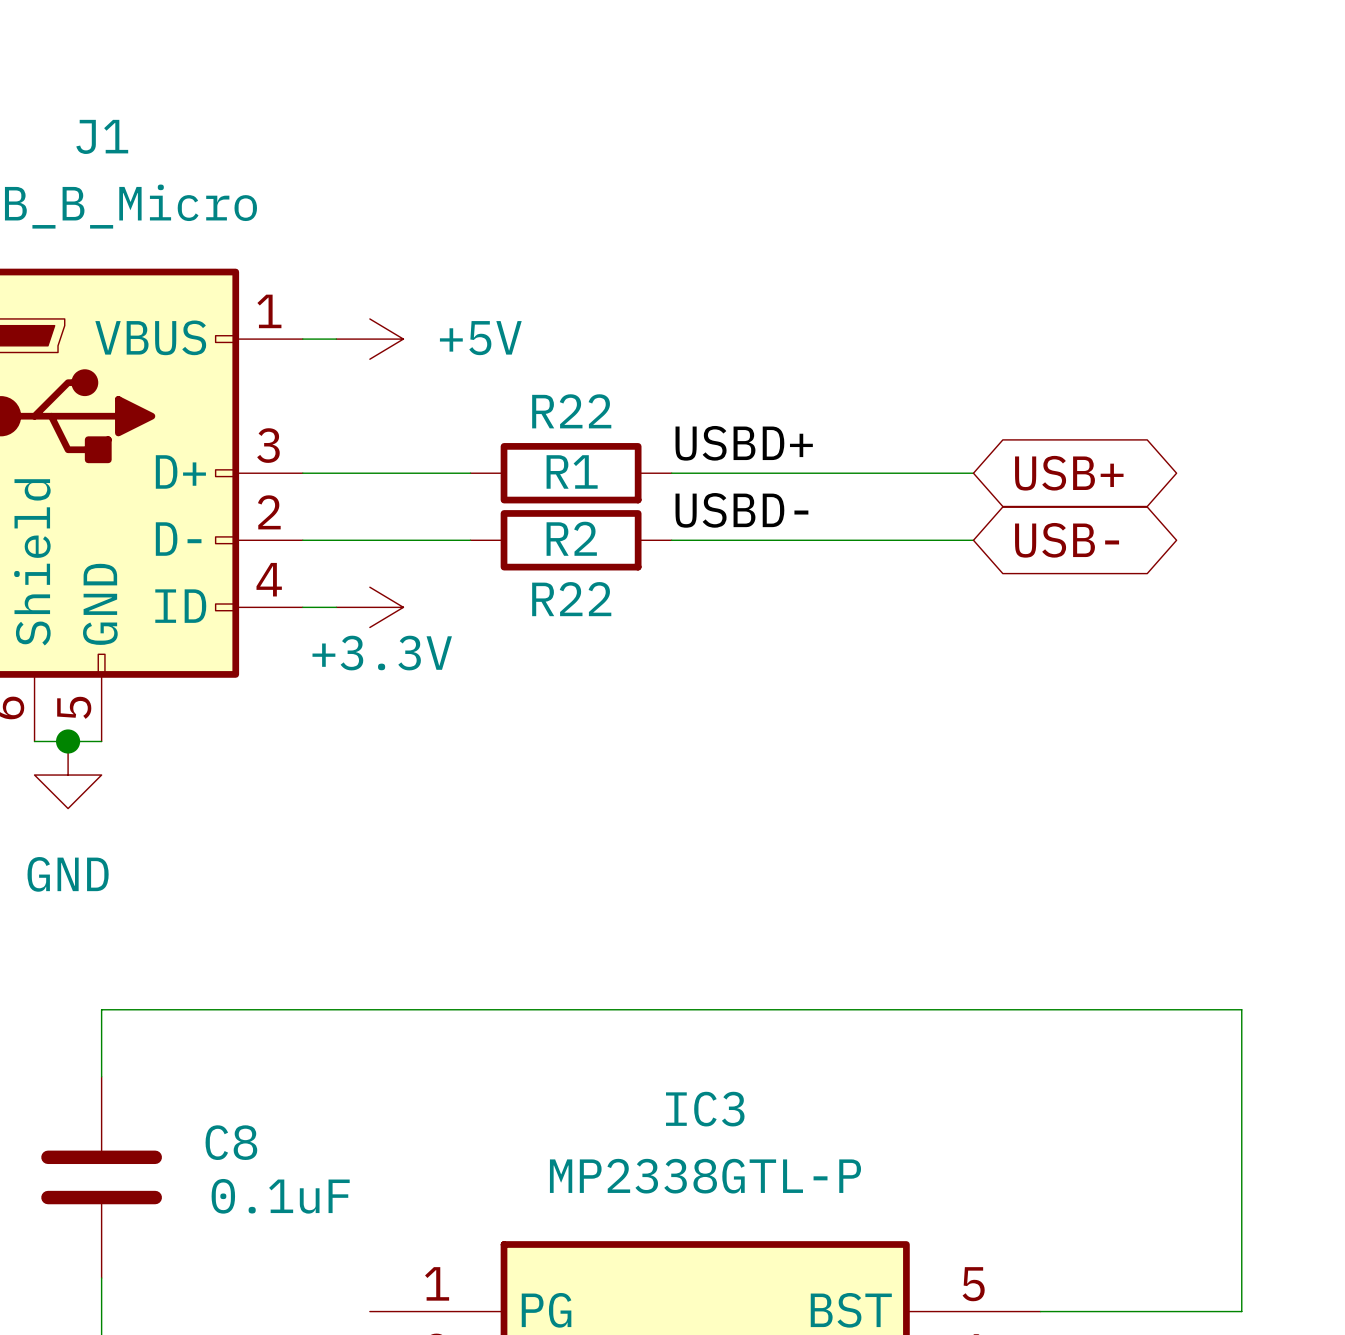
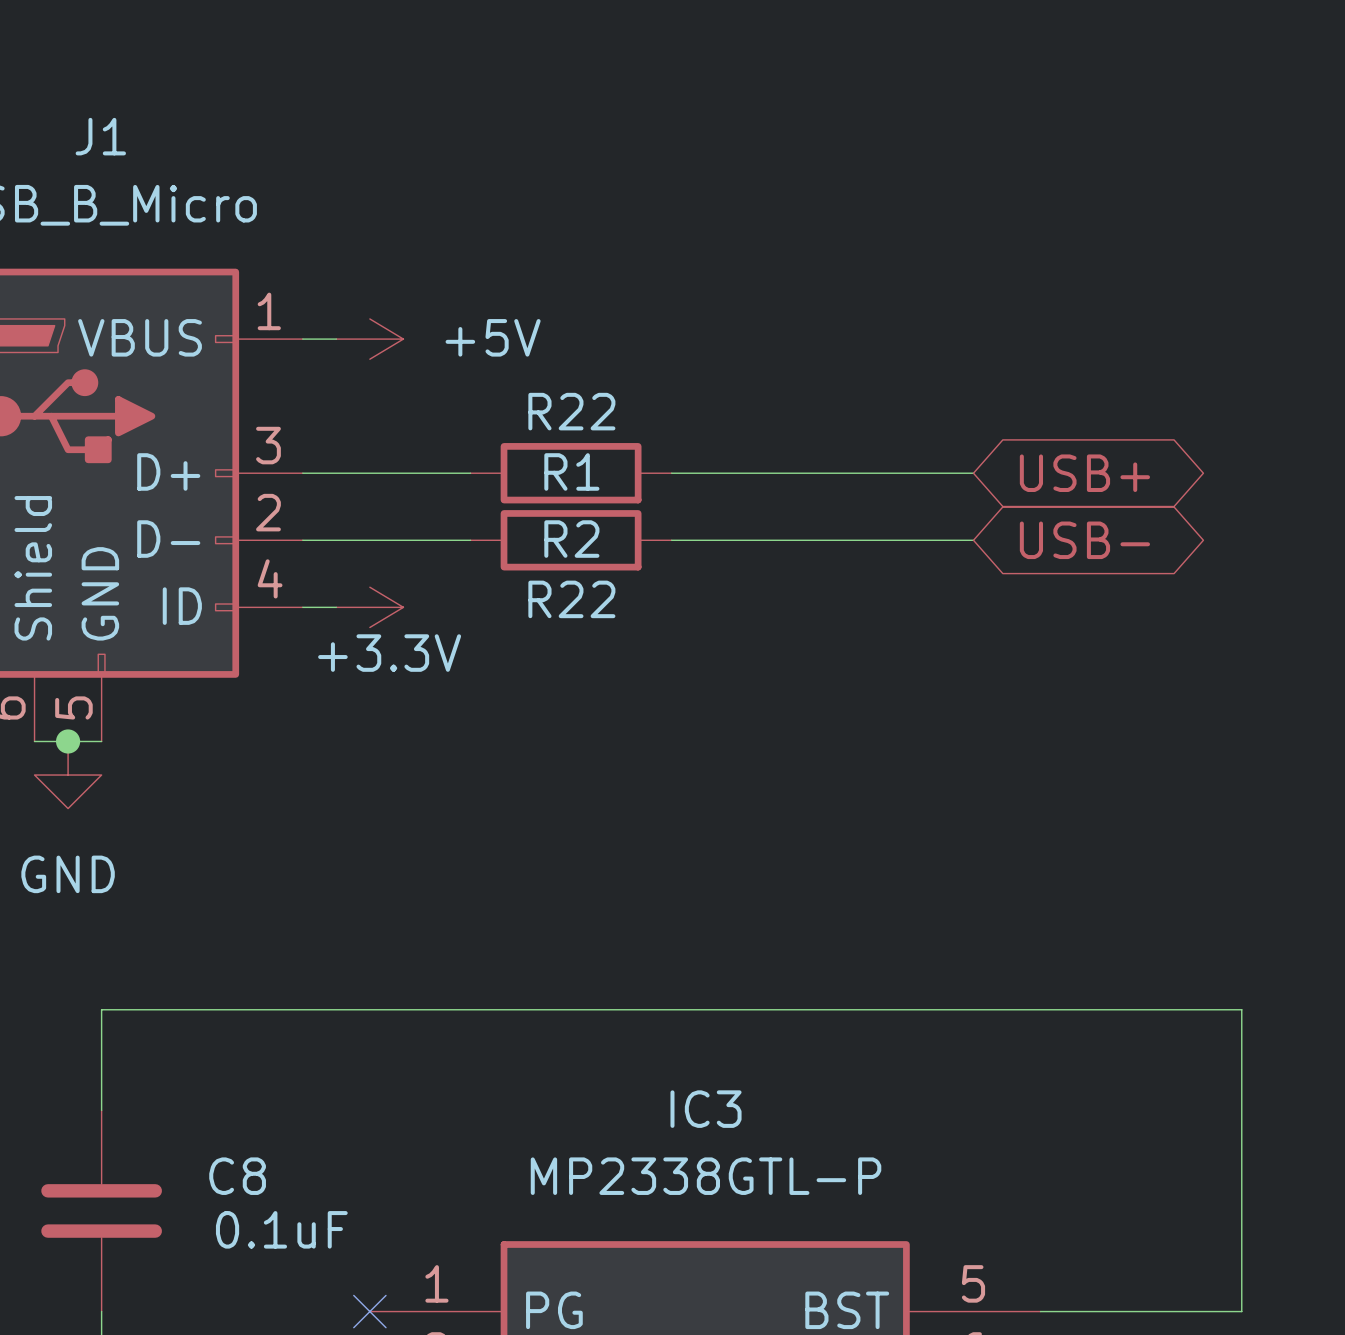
label: USBD+ (744, 443) -> none
label: USBD- (741, 510) -> none
C8 position: (101, 1177) -> (101, 1210)
no-connect mark: none -> (369, 1311)

